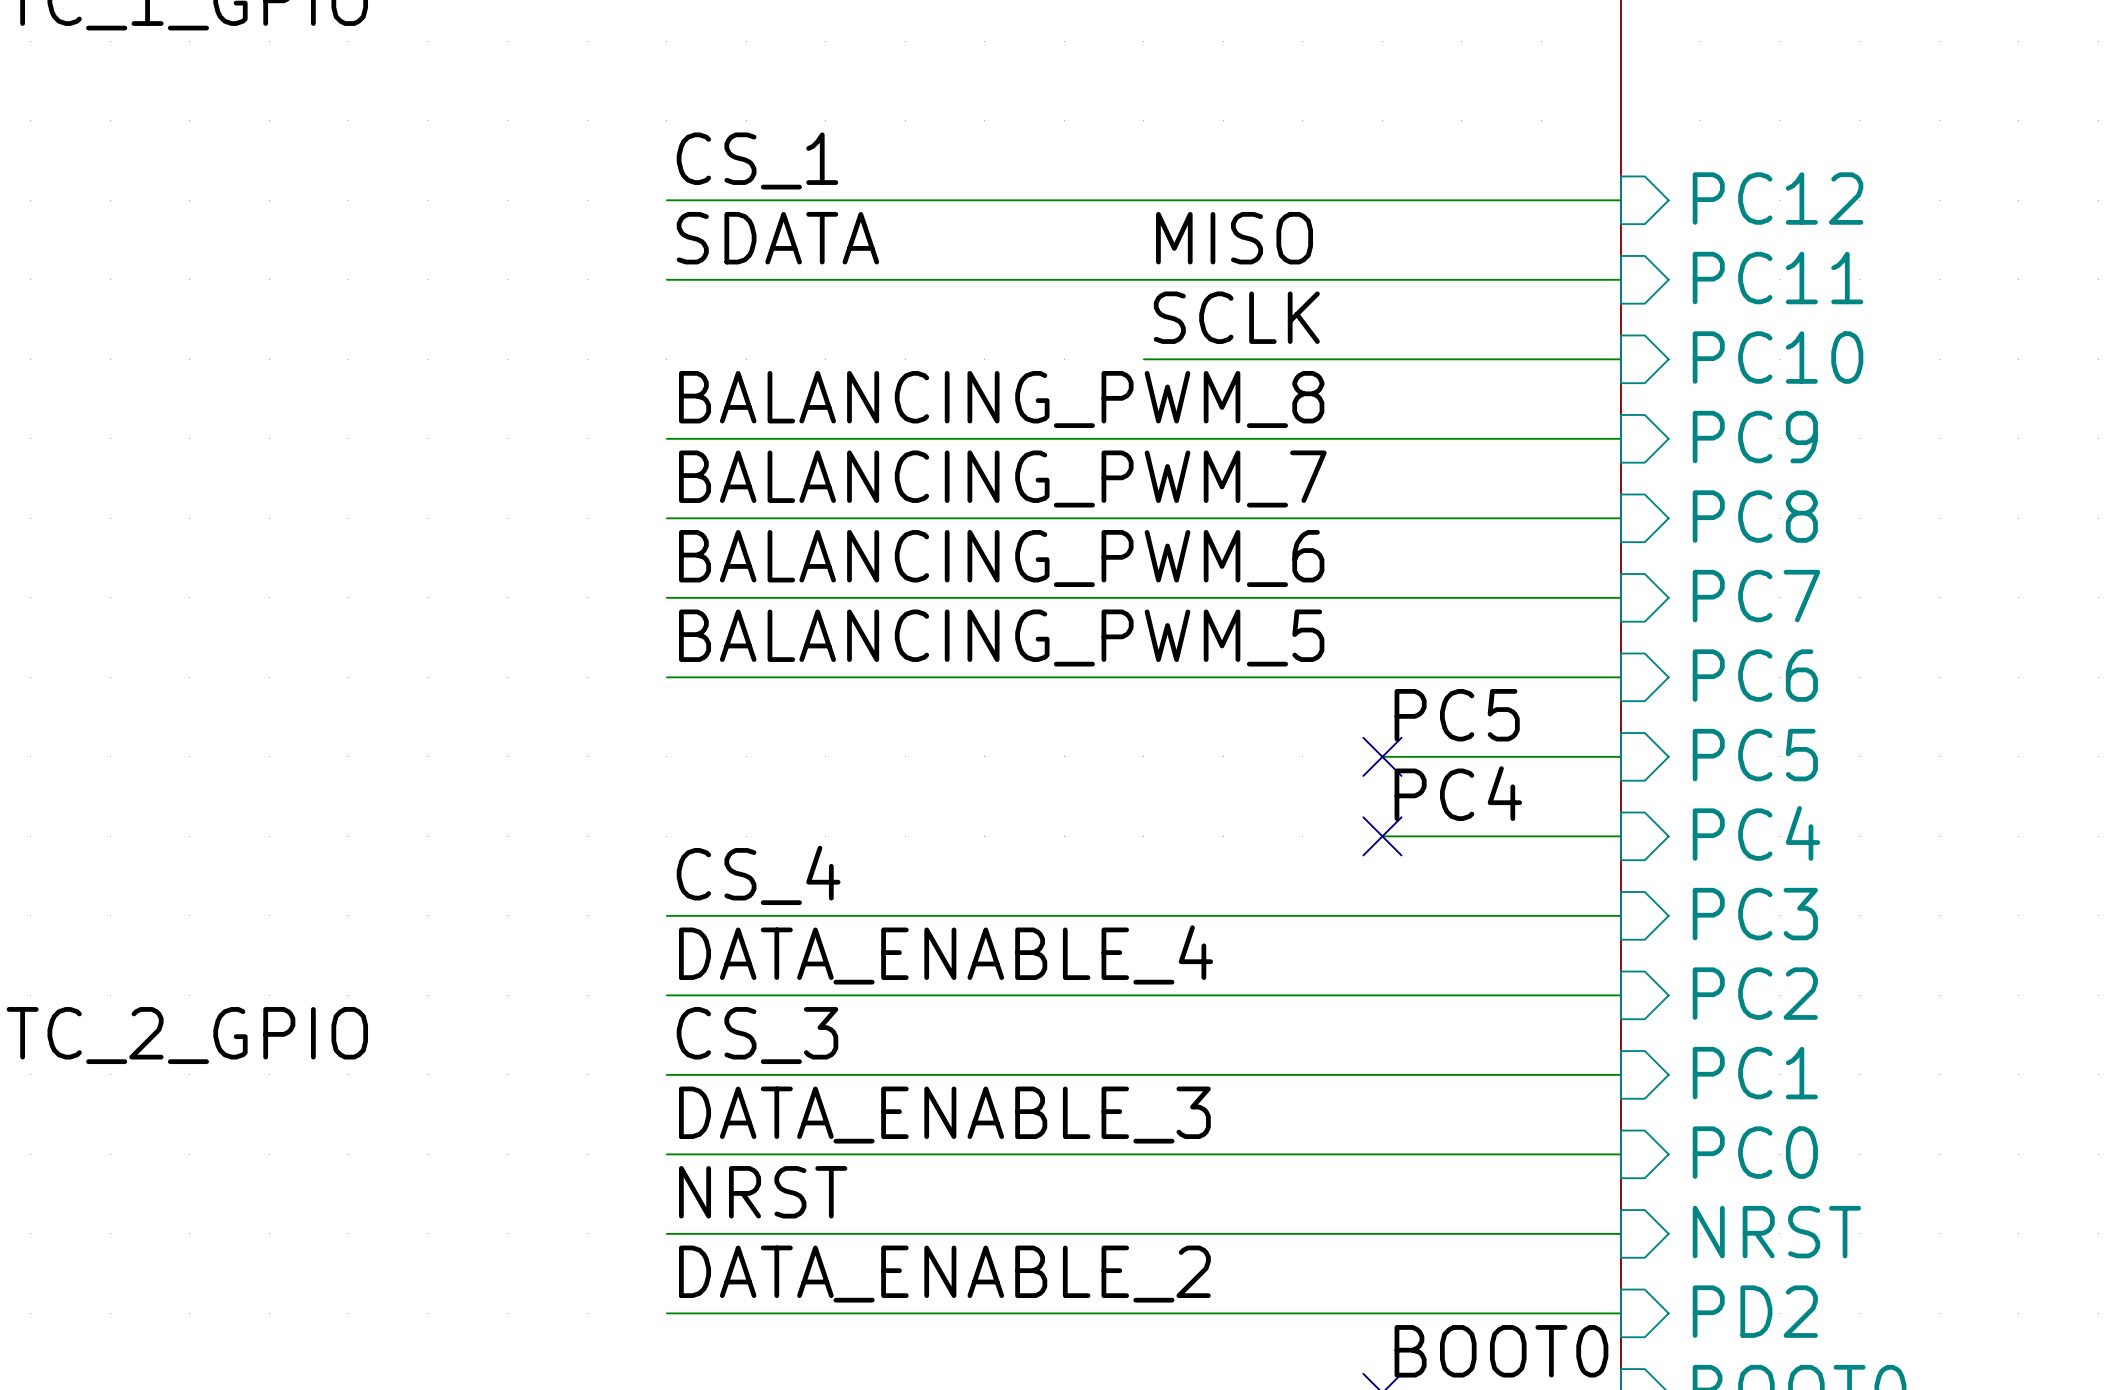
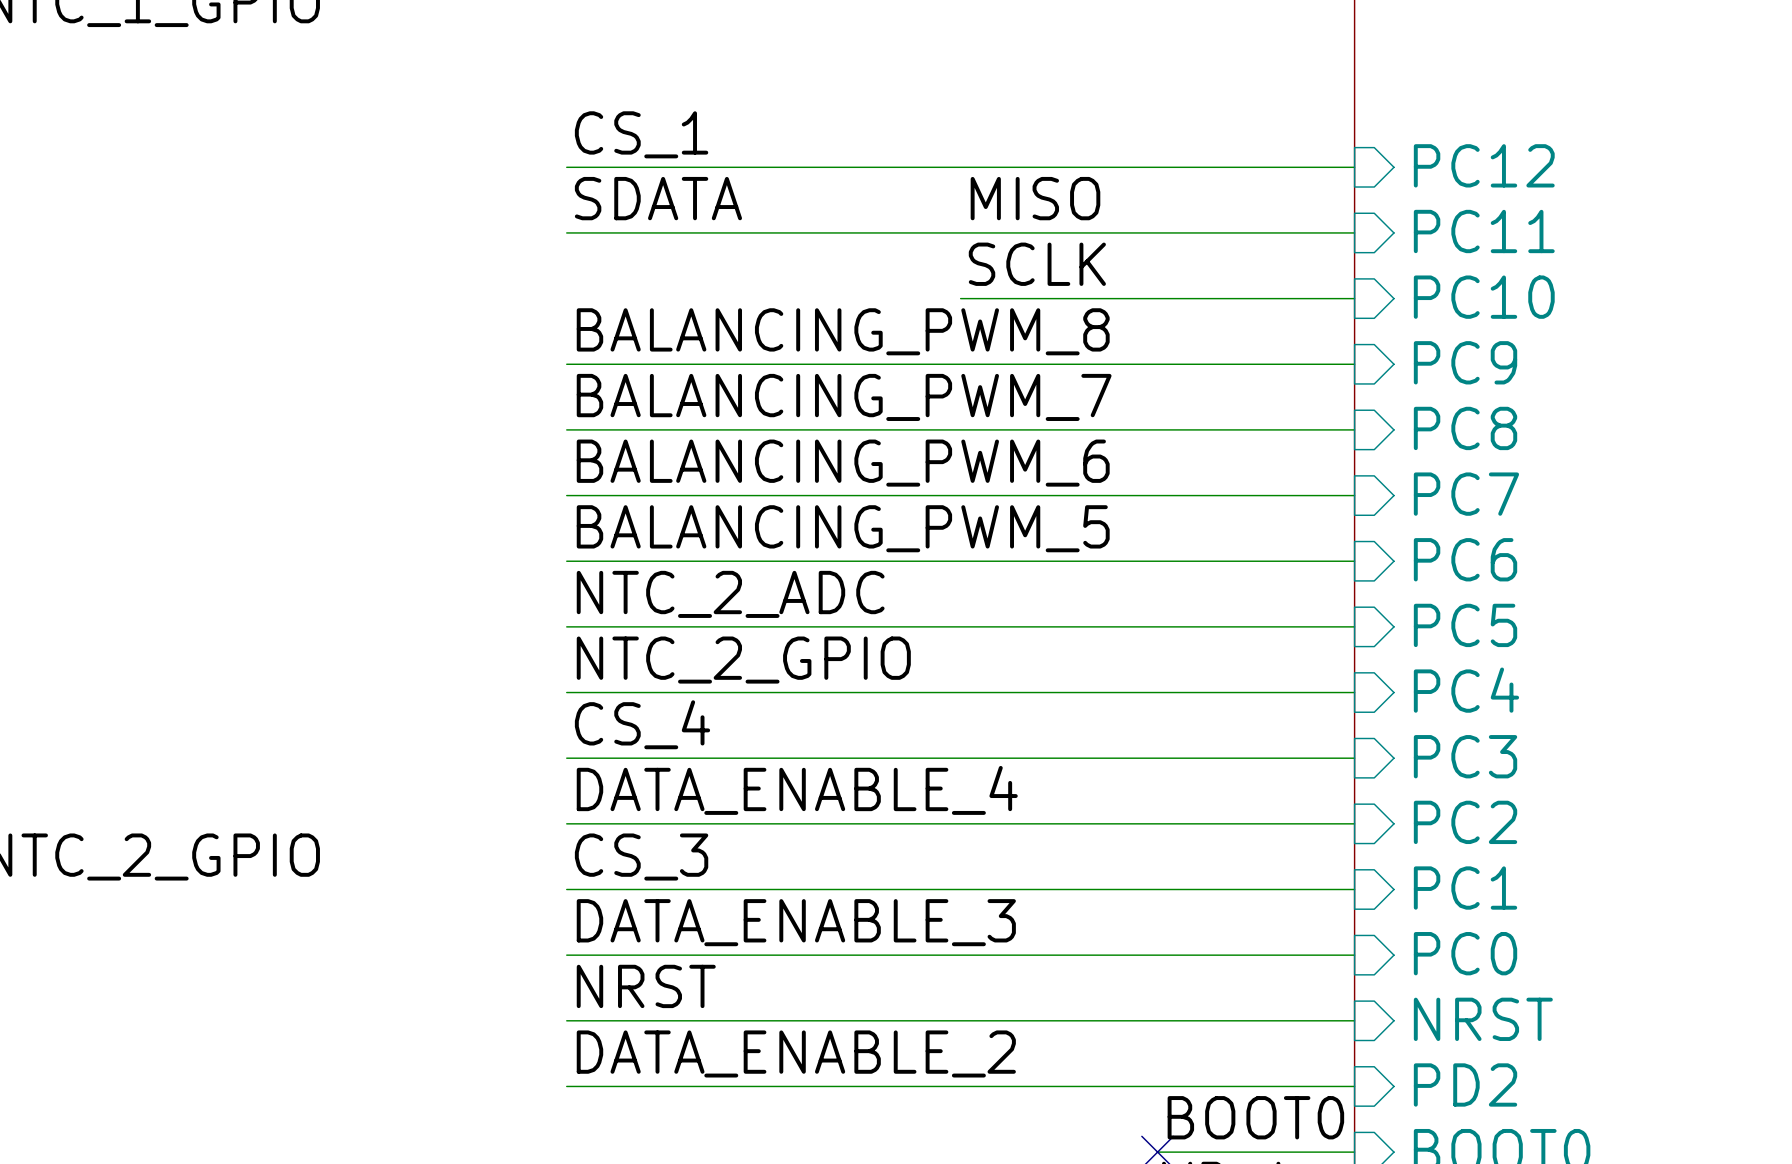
label: PC5 (1457, 715) -> none
label: none -> NTC_2_ADC (730, 594)
wire: none -> (566, 626) (1157, 626)
no-connect mark: (1382, 756) -> none
label: PC4 (1458, 793) -> none
label: none -> NTC_2_GPIO (743, 660)
wire: none -> (566, 692) (1157, 692)
no-connect mark: (1382, 836) -> none

